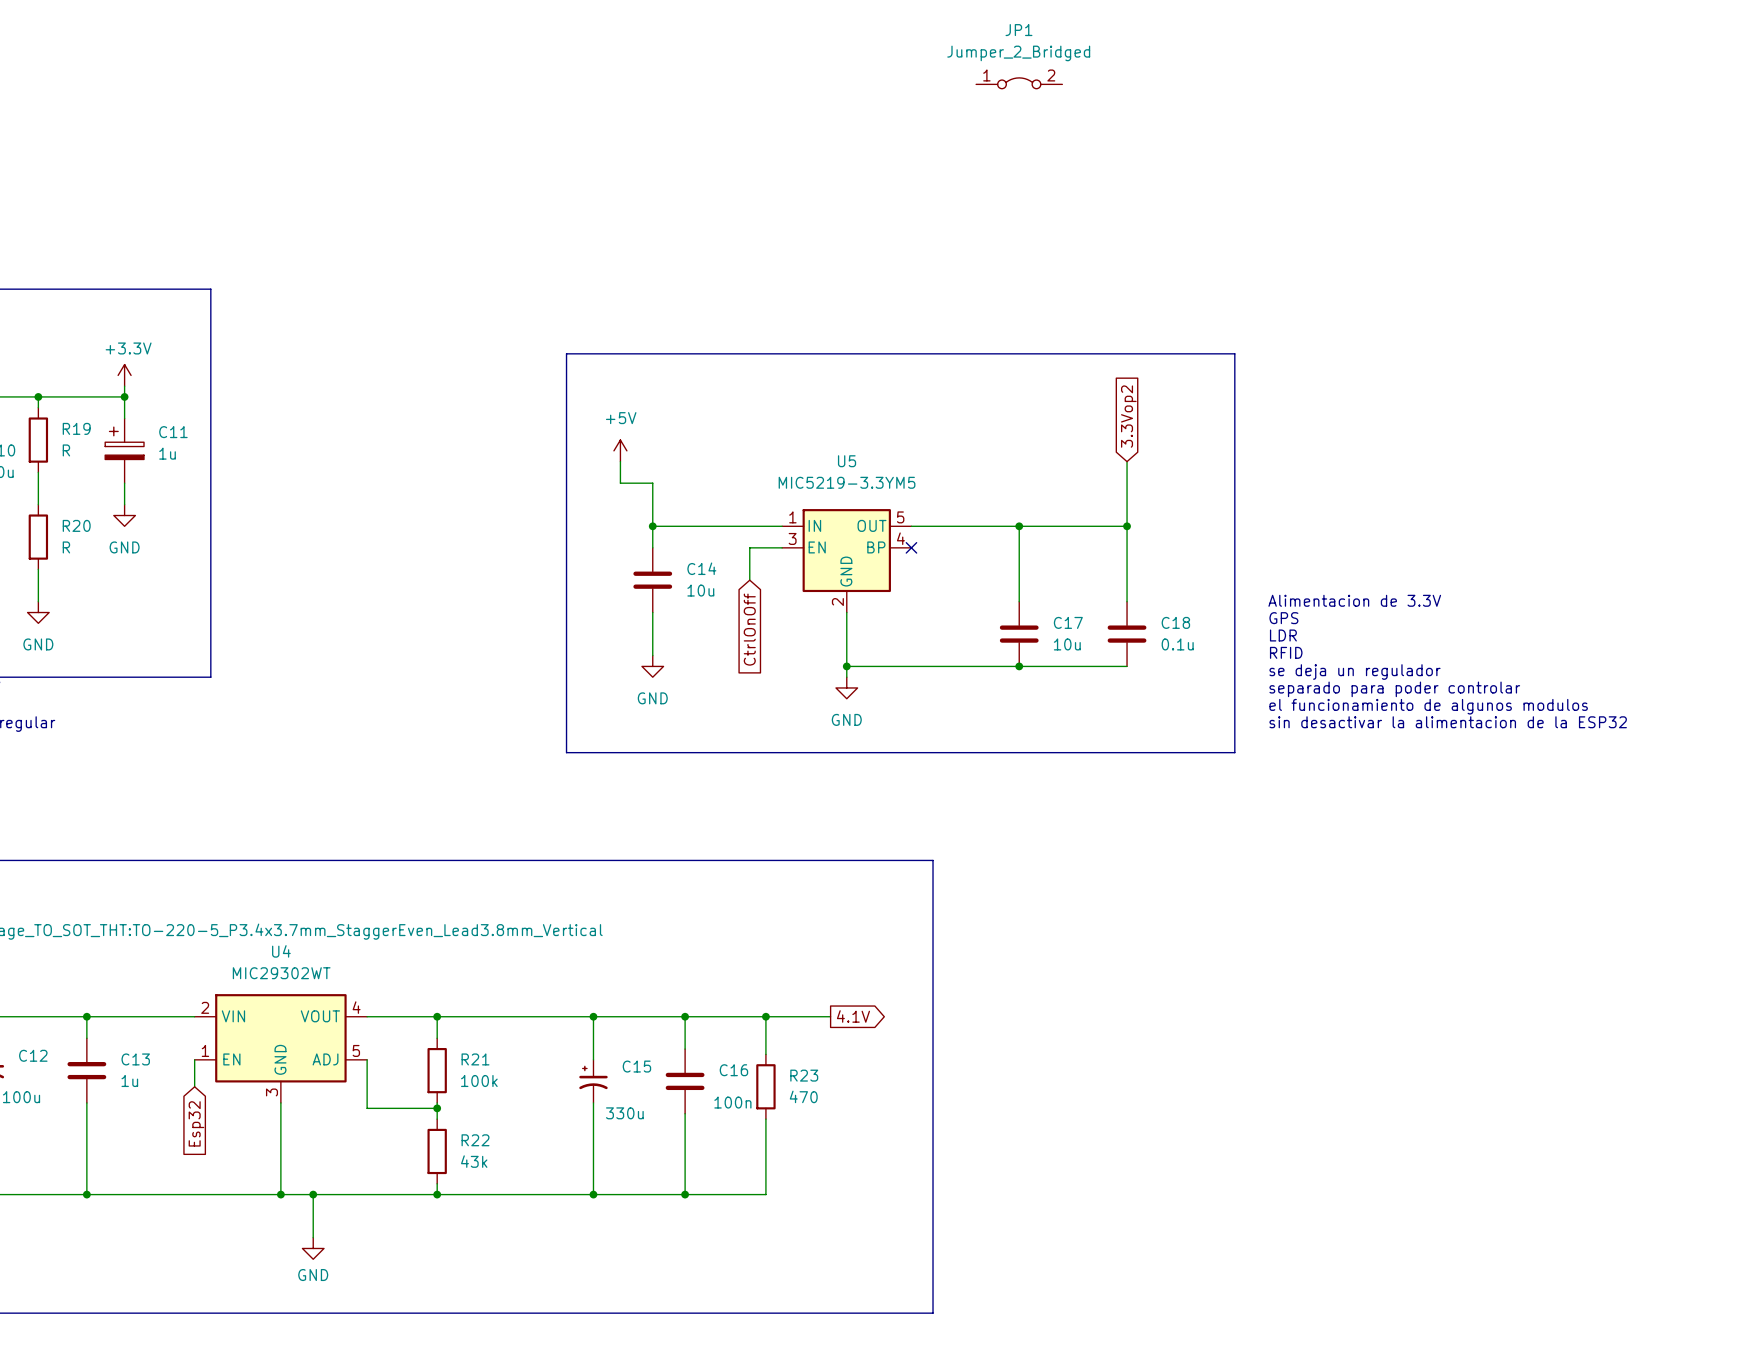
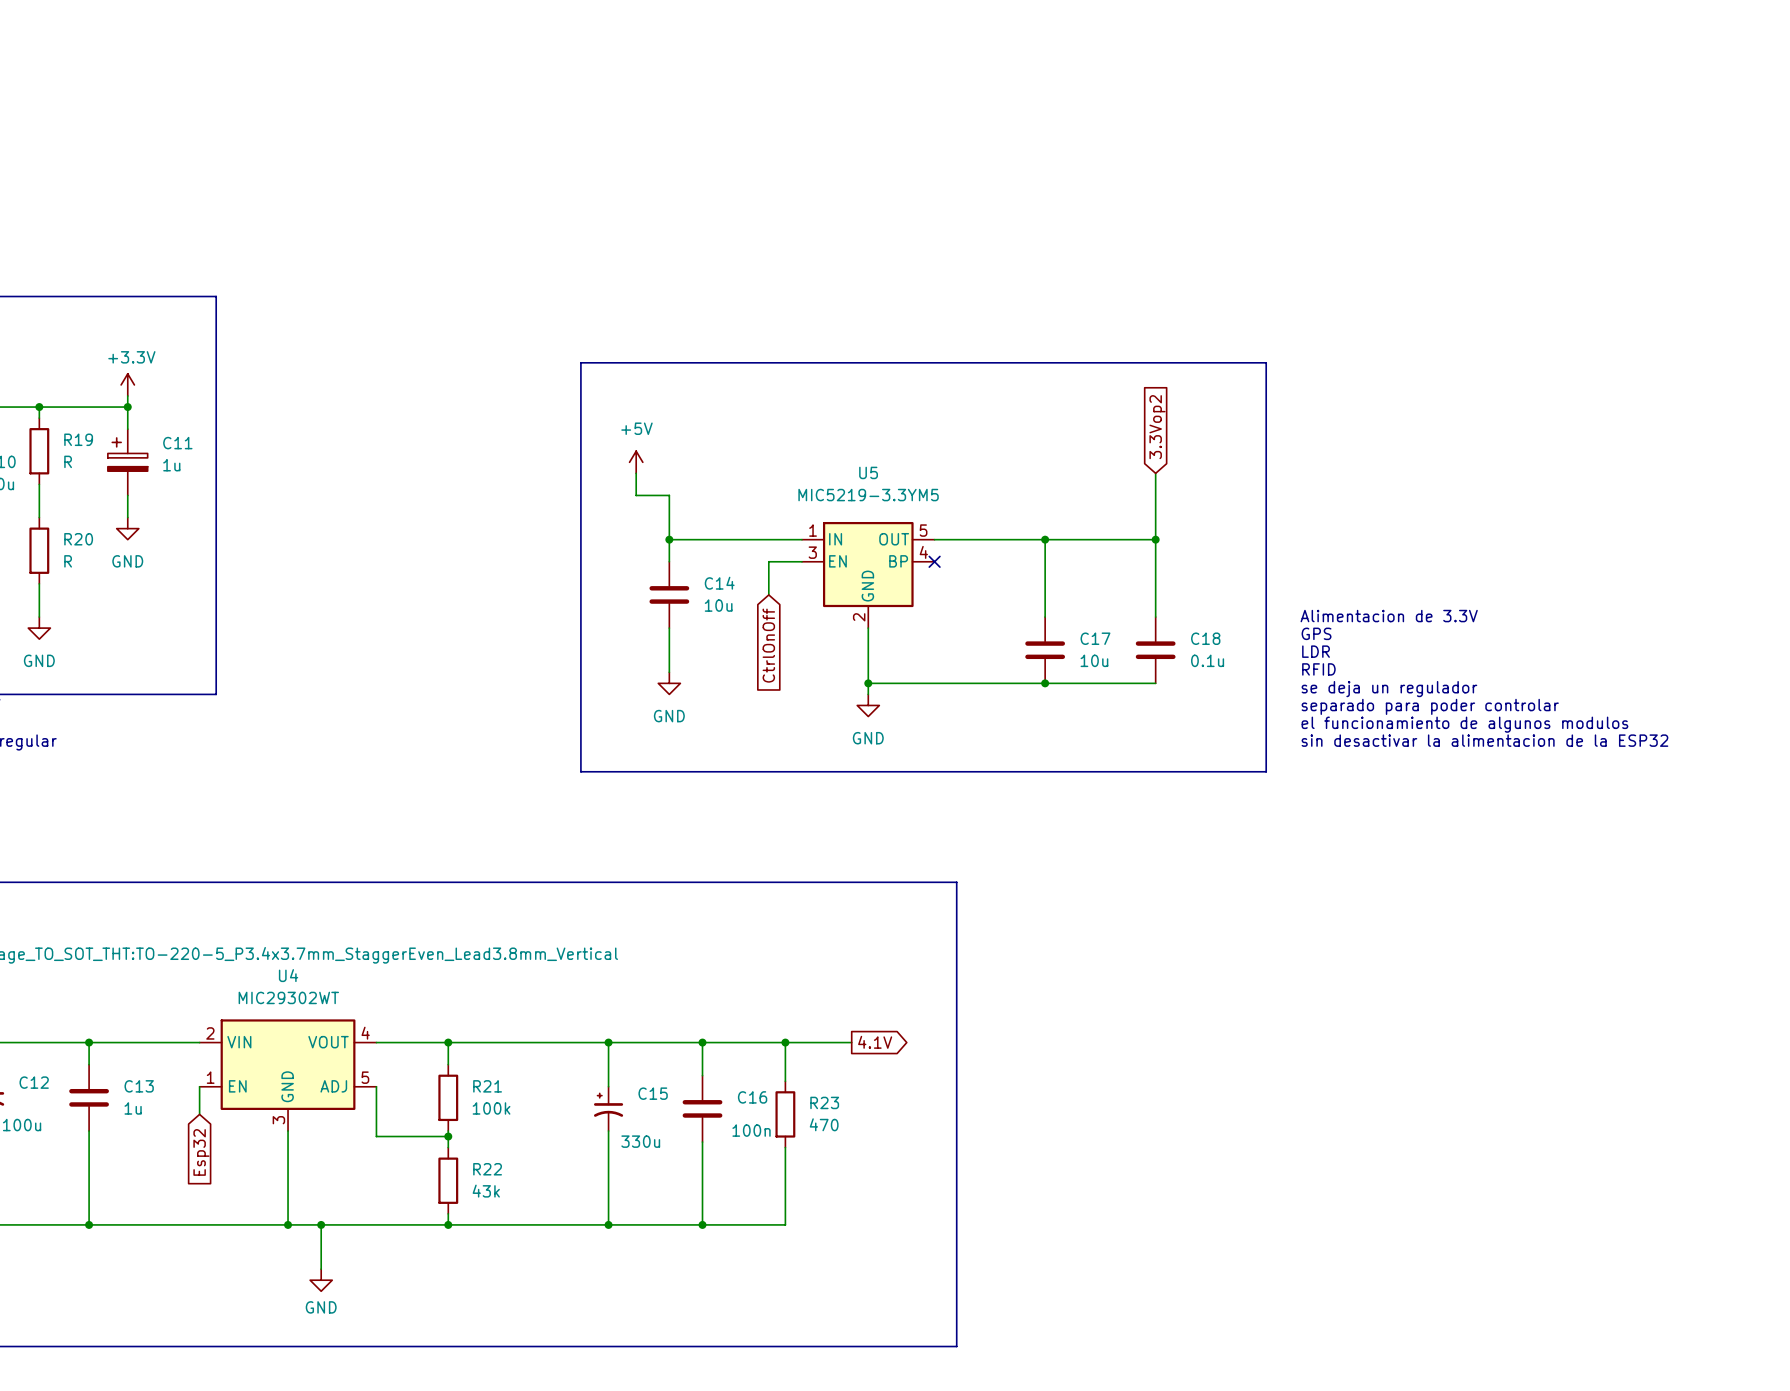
JP1: Jumper_2_Bridged (1019, 83) -> none

